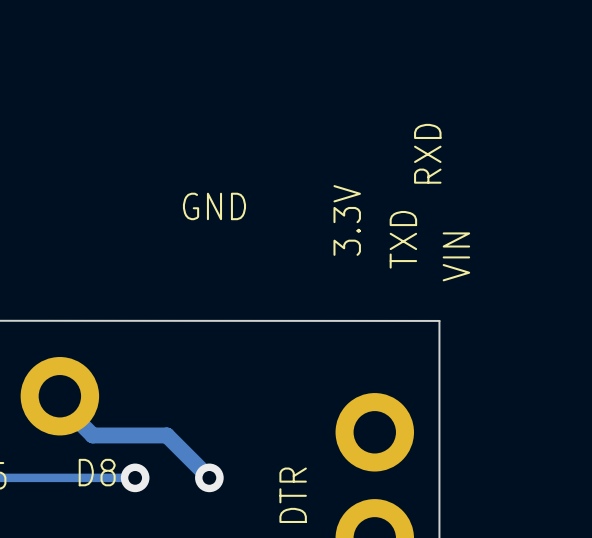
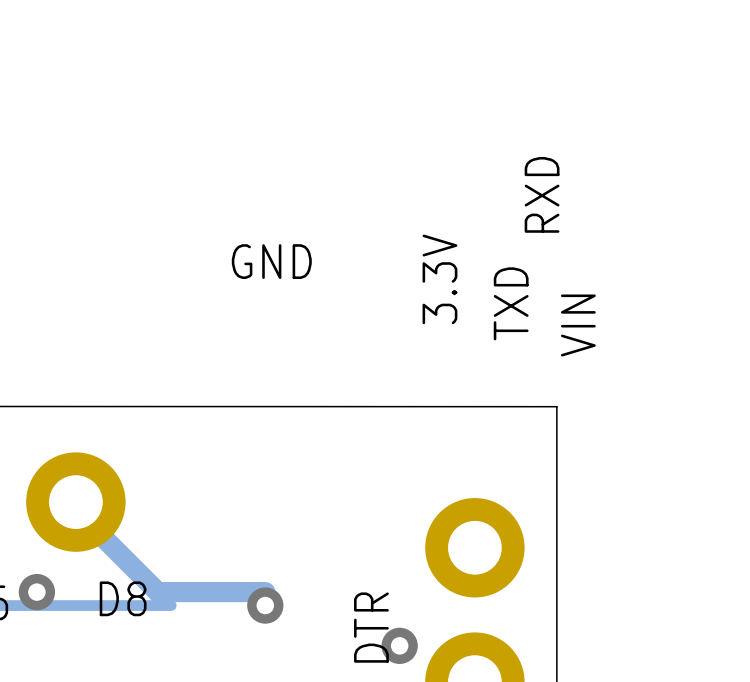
track: (92, 435) (166, 435) (209, 477) -> (117, 551) (157, 592) (265, 592)
via: none -> (36, 592)
via: (135, 477) -> none
via: none -> (399, 645)

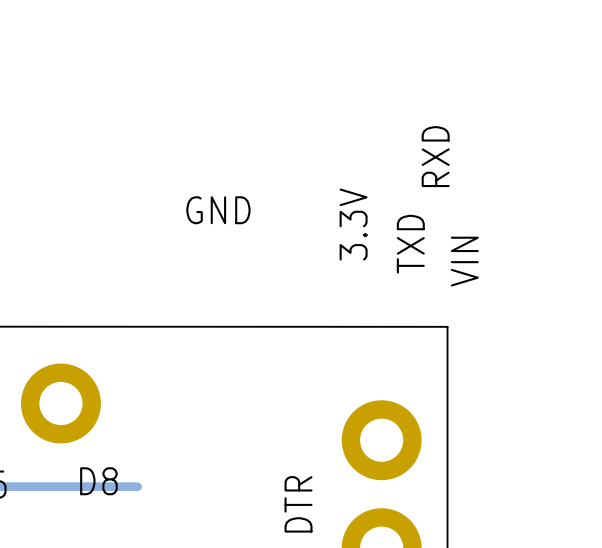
track: (75, 502) (77, 511) (157, 592) (265, 592) -> none
via: (36, 592) -> none
via: (265, 605) -> none
via: (399, 645) -> none

